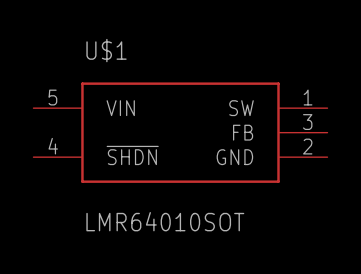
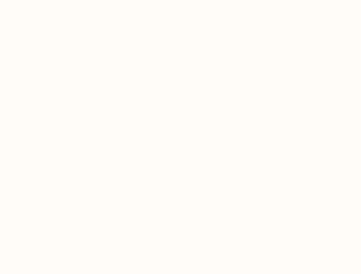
U$1: LMR64010SOT (180, 132) -> none

